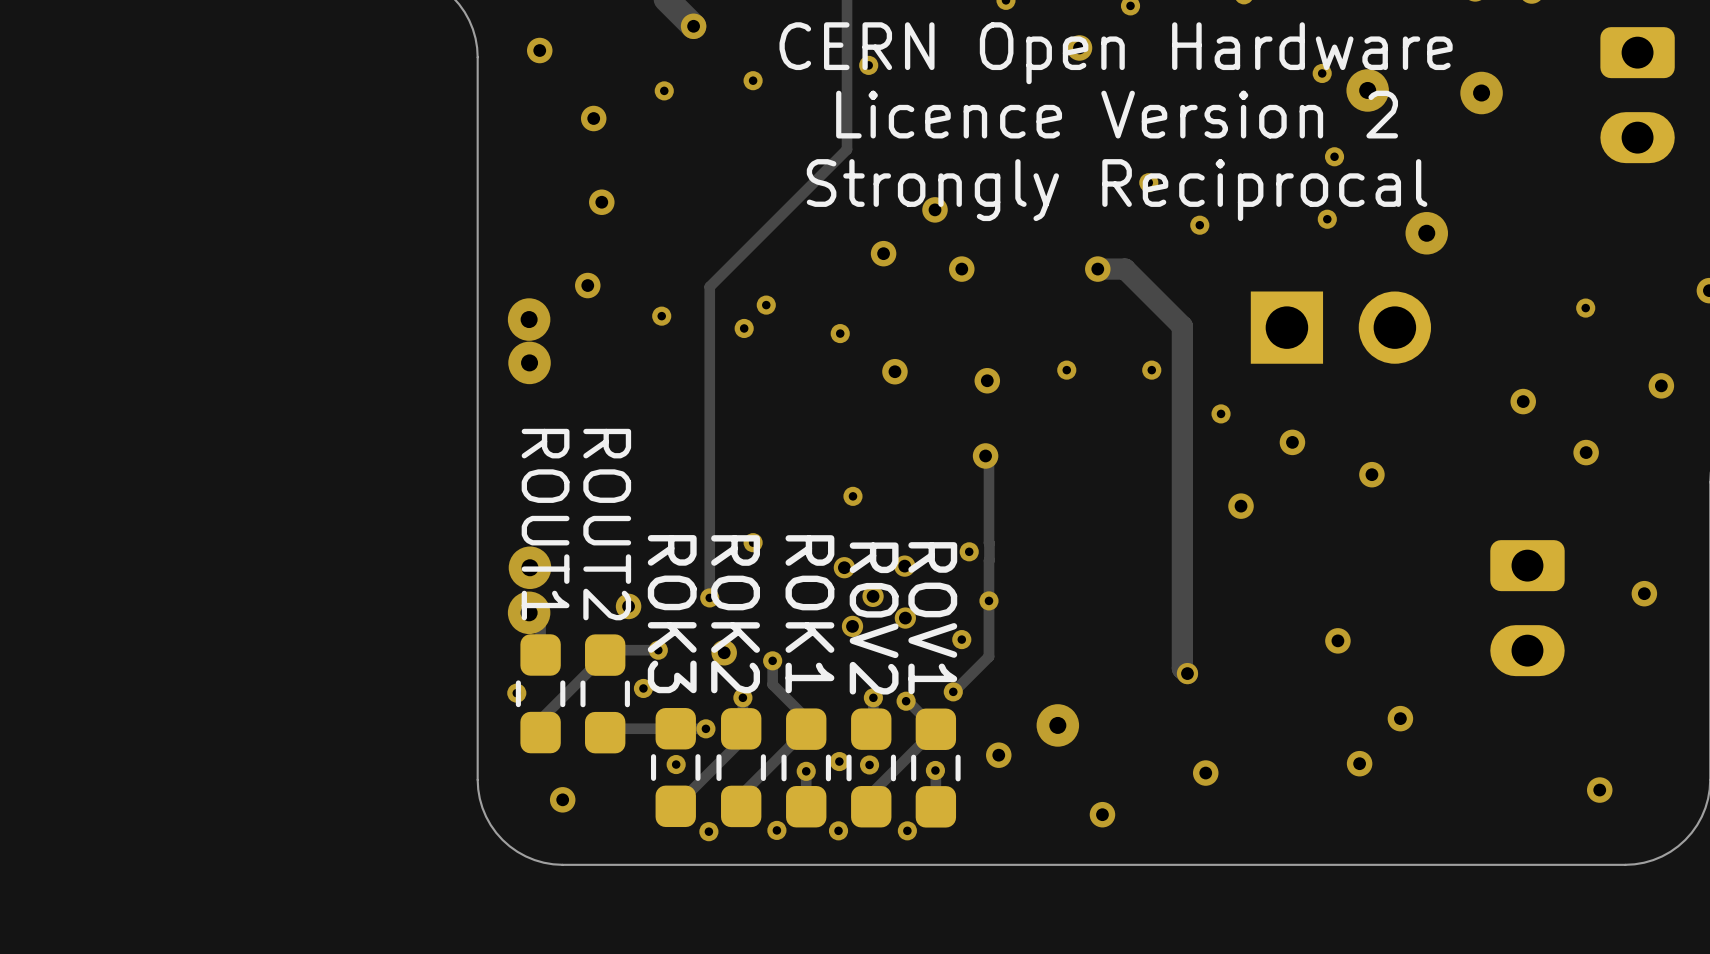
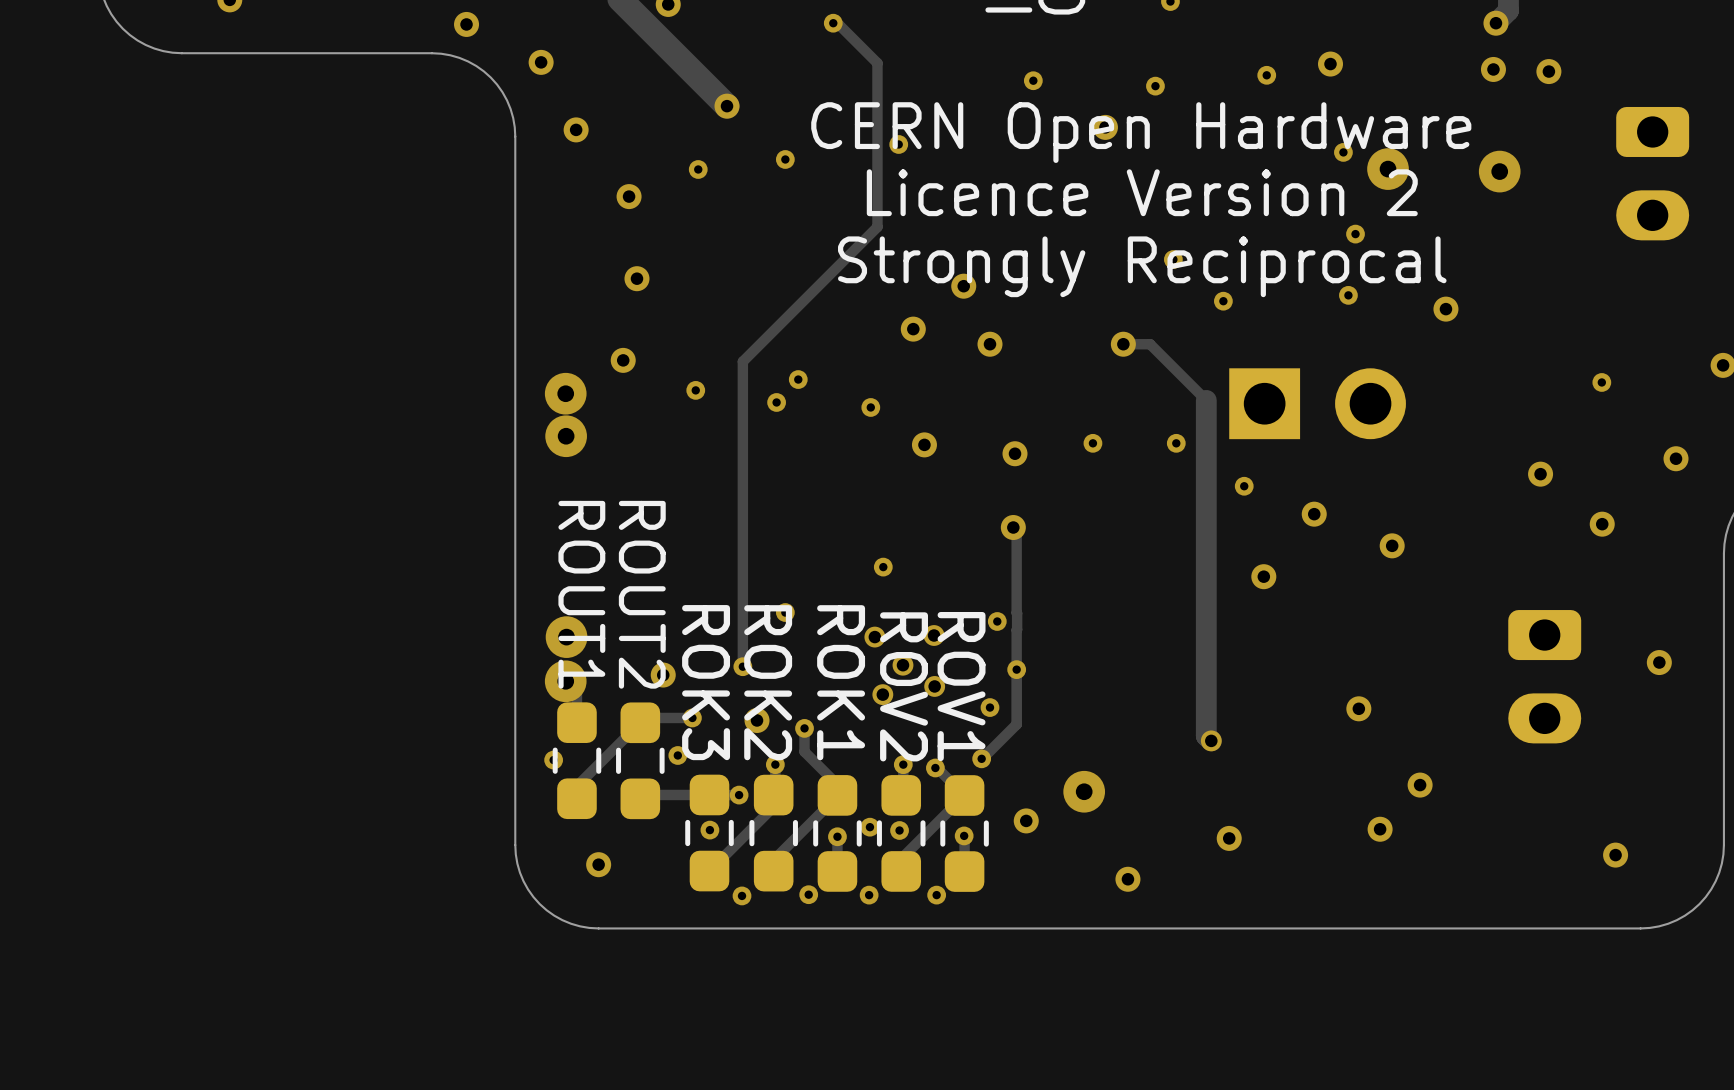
via size: [1405, 212, 1449, 255] -> [1433, 296, 1459, 322]
track width: thick (1097, 269) (1125, 269) (1182, 326) -> thin (1123, 344) (1150, 344) (1206, 400)
part position: (1340, 327) -> (1317, 403)

